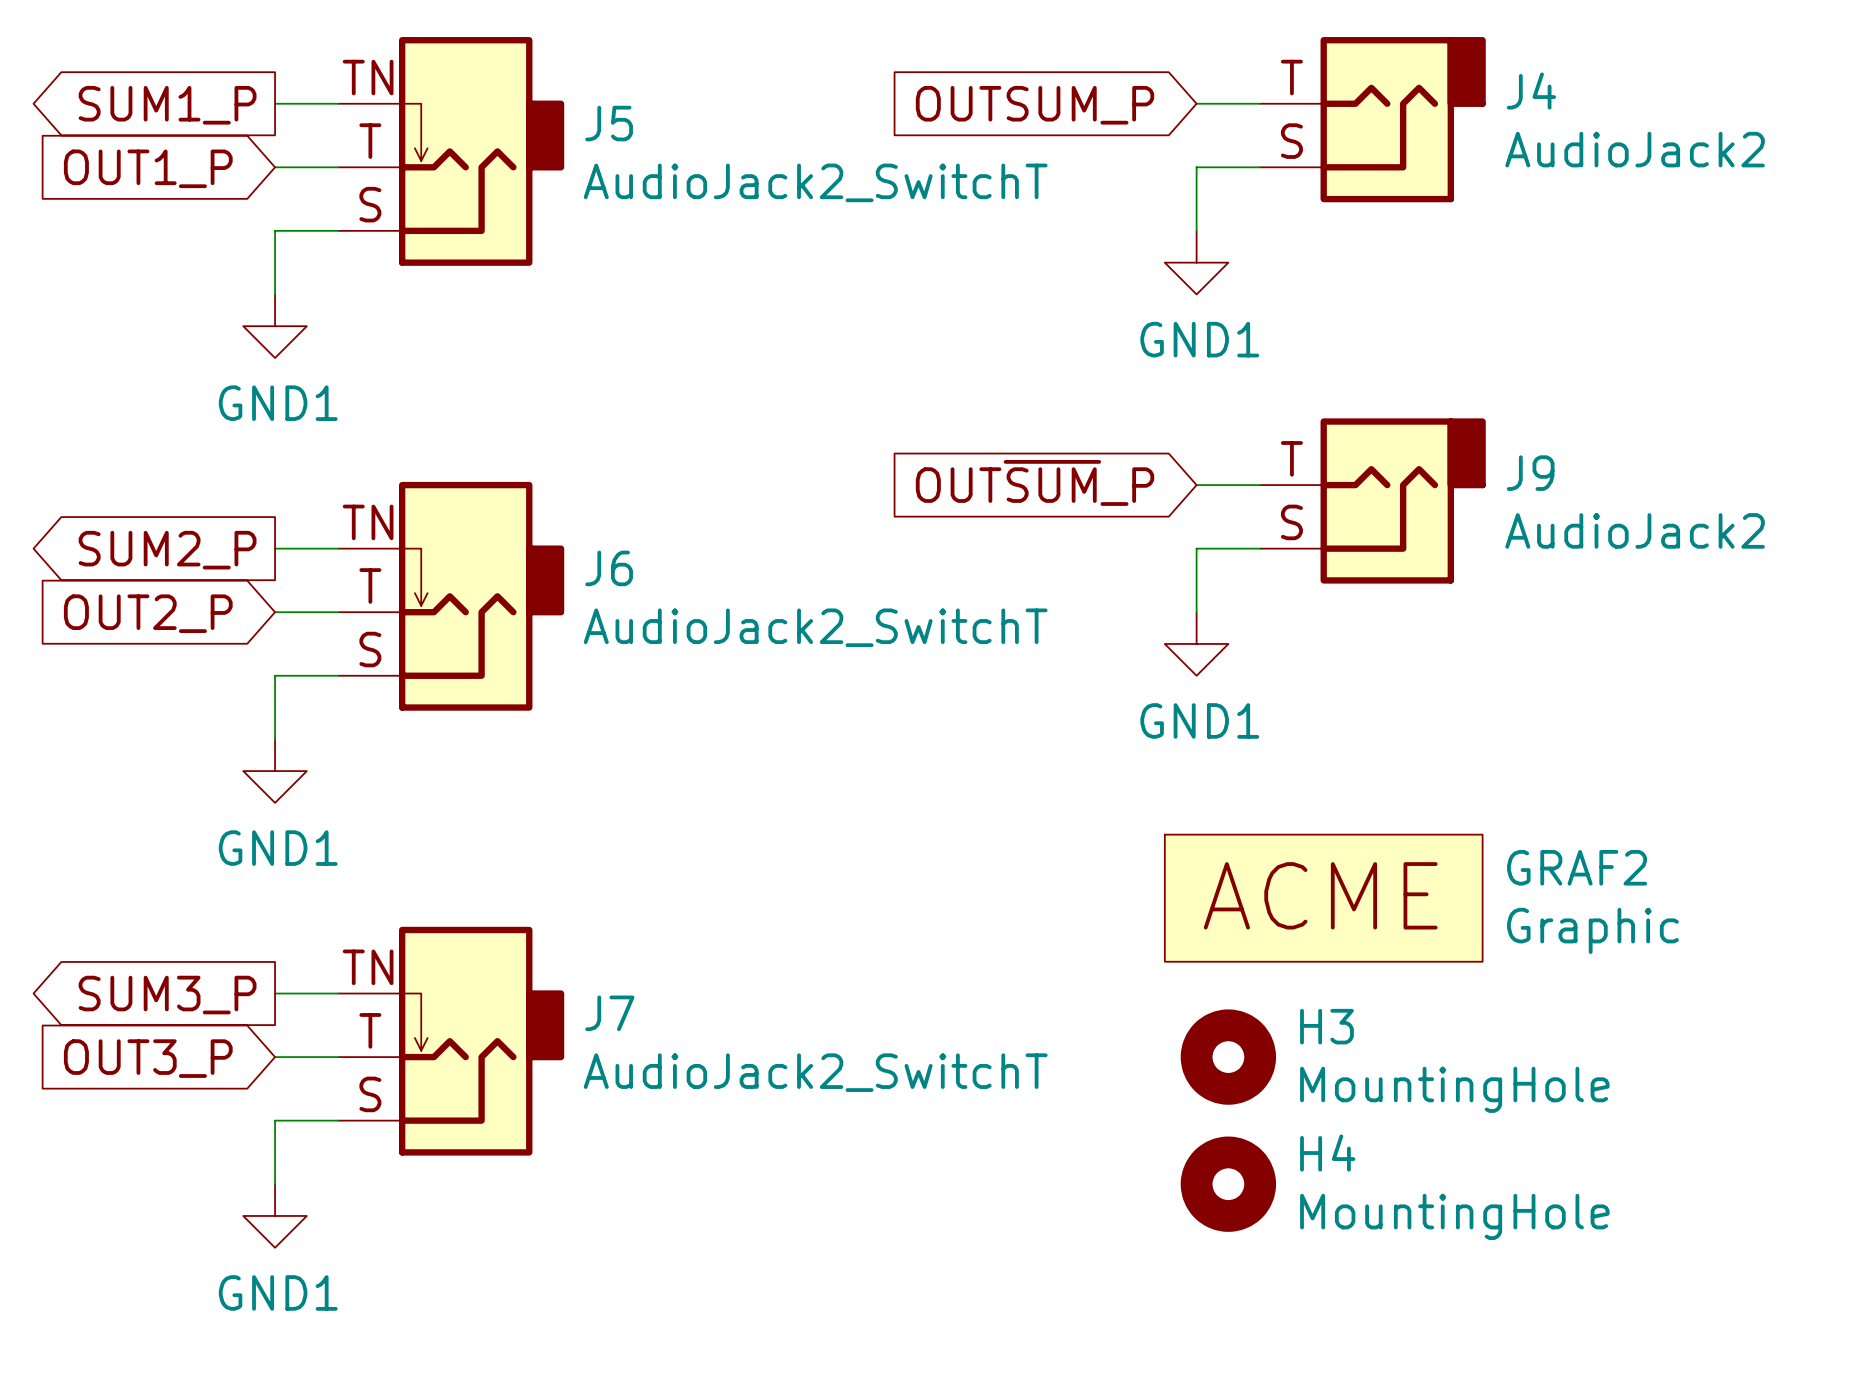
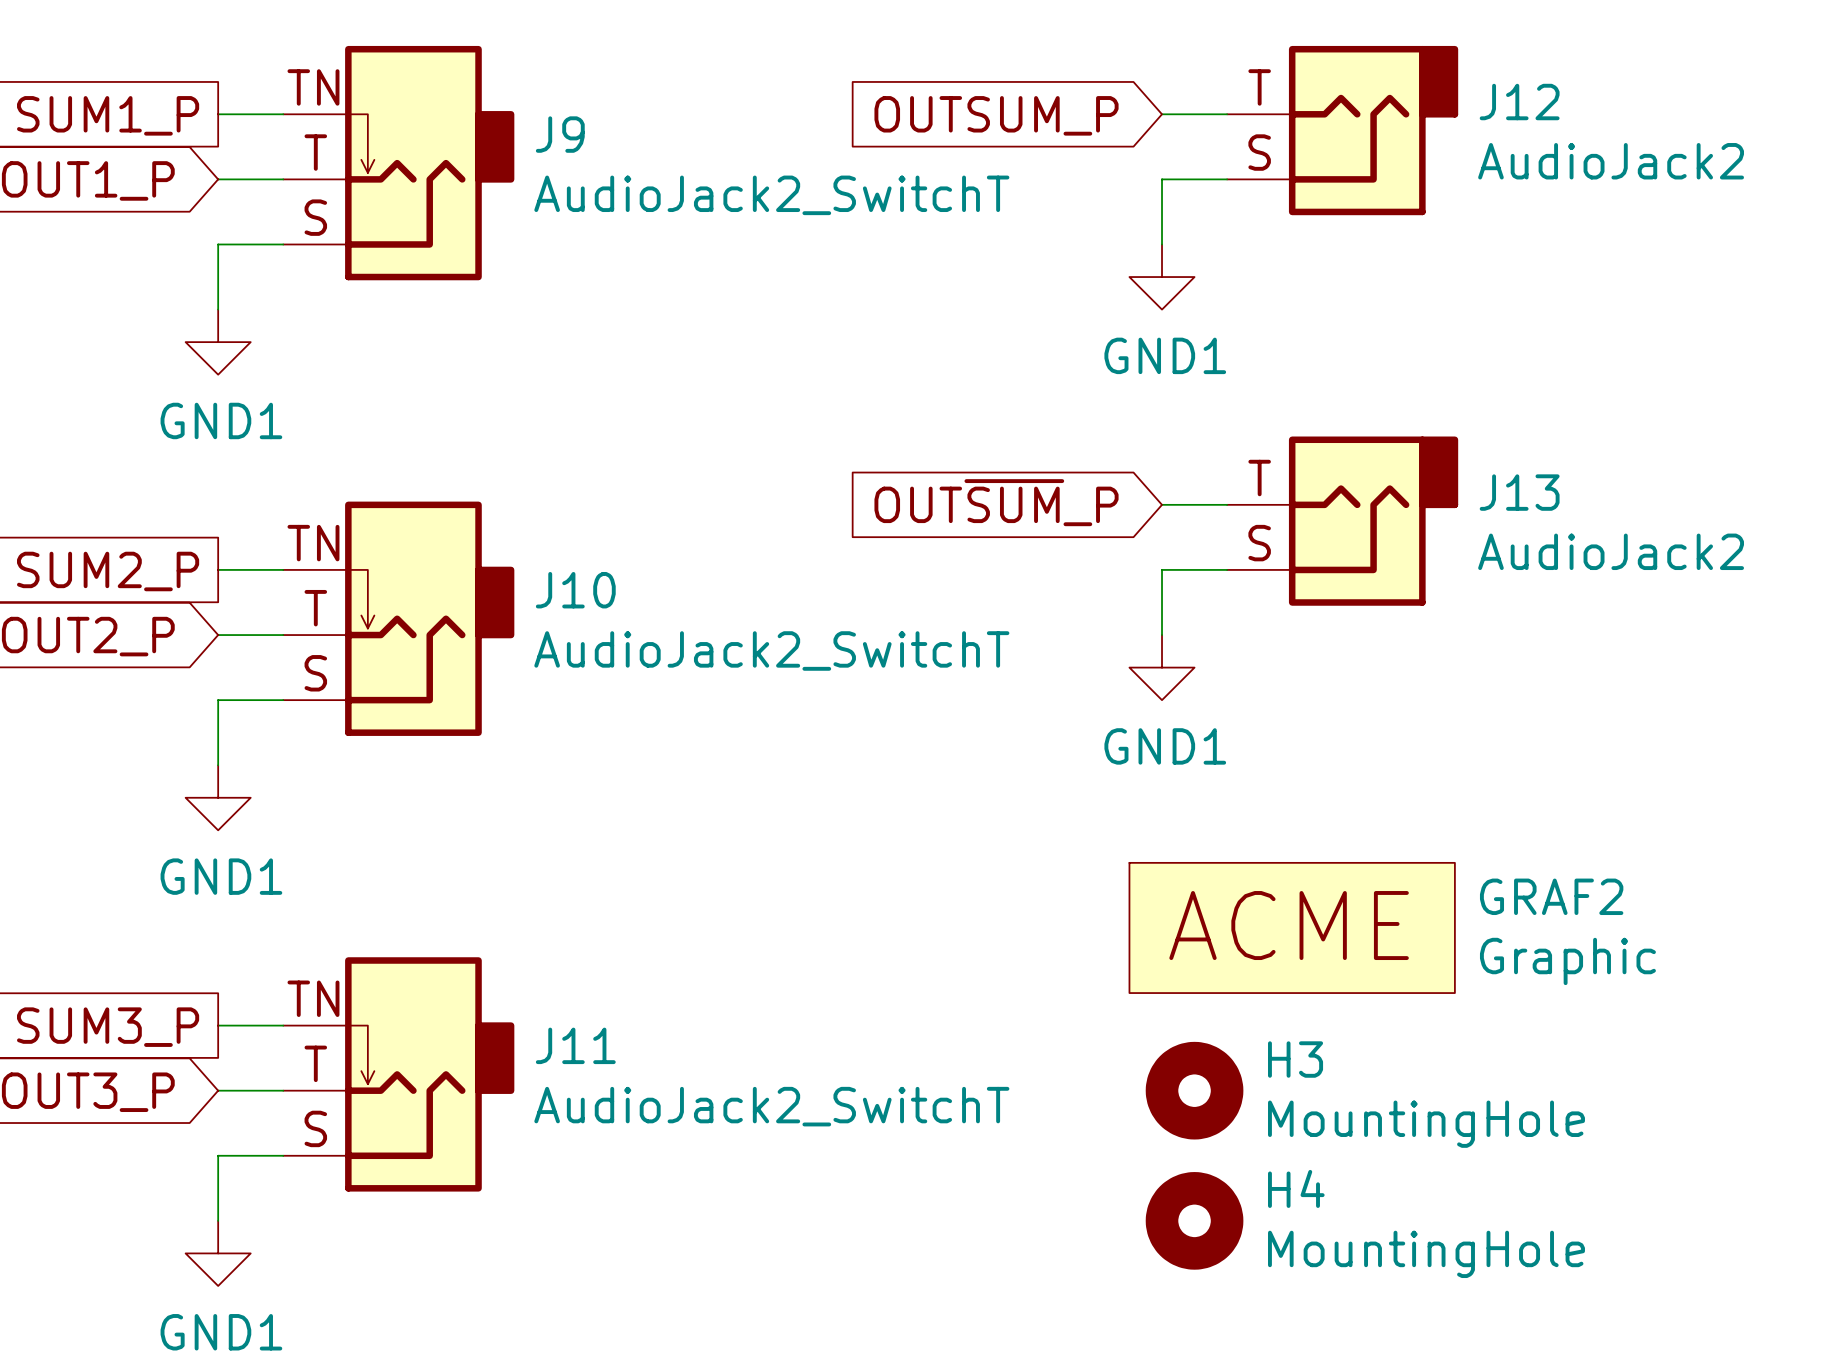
J4 name: J4 (1531, 91) -> J12 (1519, 102)
J5 name: J5 (609, 123) -> J9 (560, 134)
J9 name: J9 (1530, 473) -> J13 (1519, 492)
J6 name: J6 (609, 568) -> J10 (575, 590)
J7 name: J7 (609, 1013) -> J11 (575, 1045)

